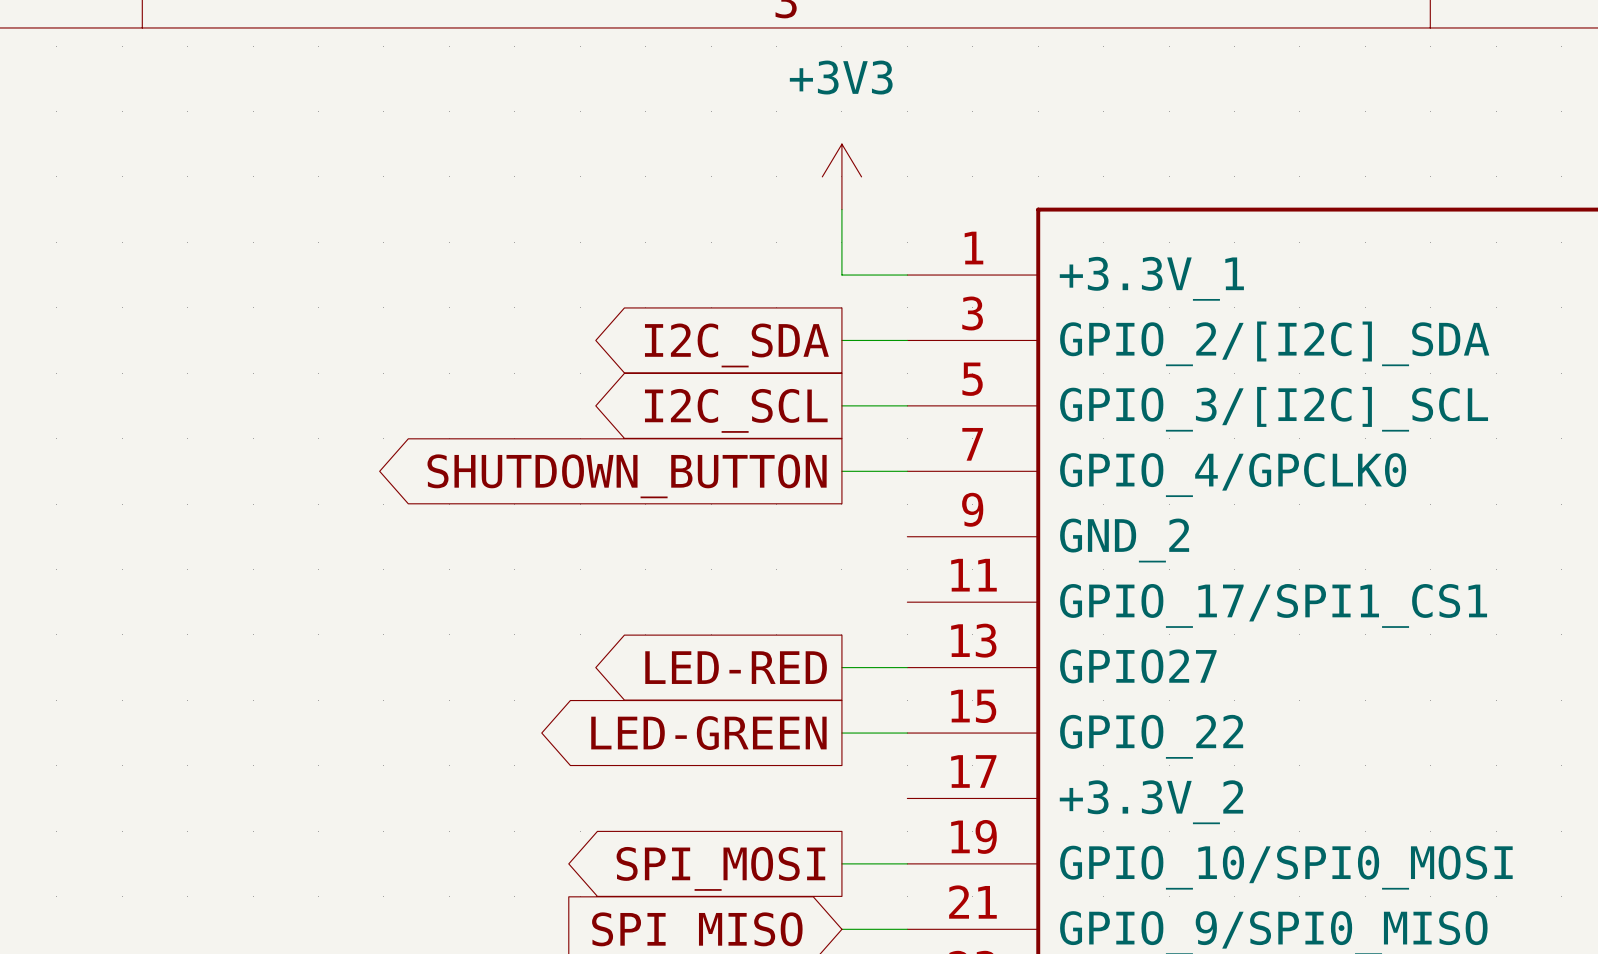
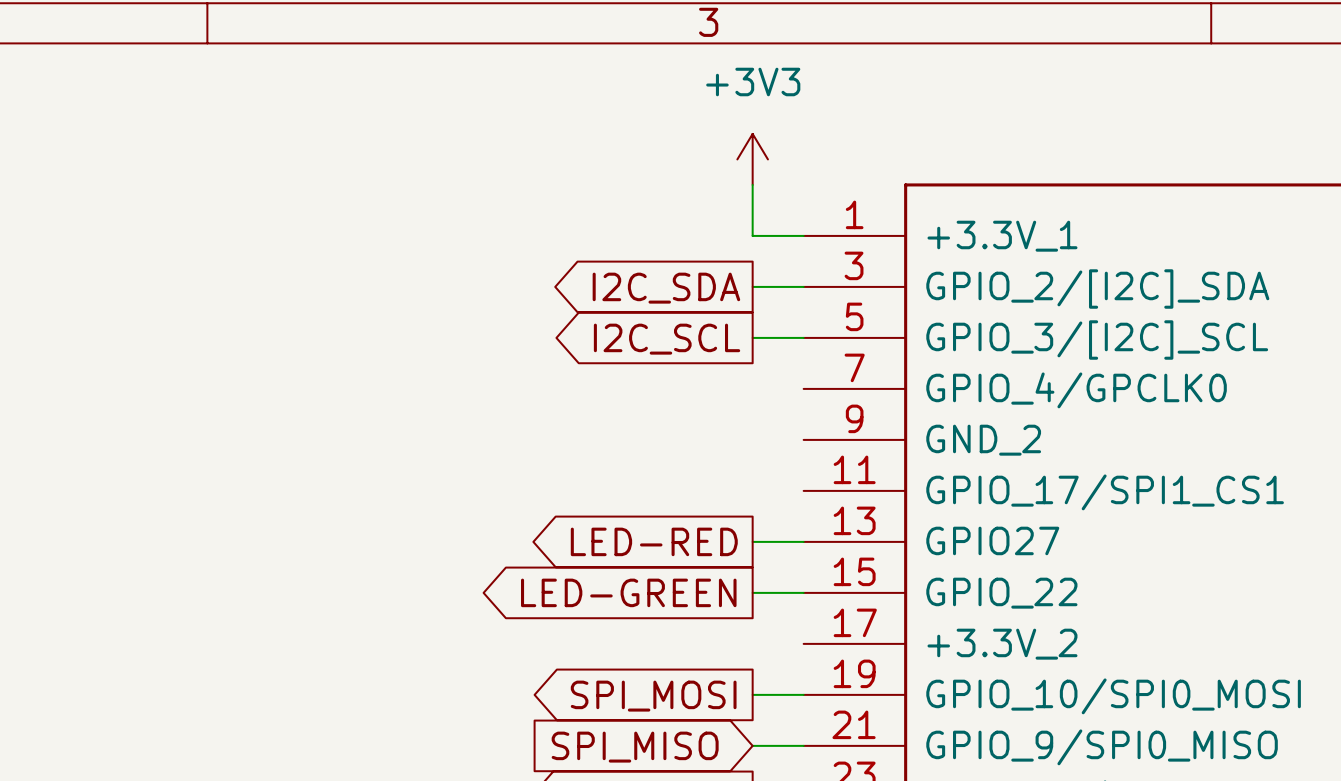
wire: (841, 471) (907, 471) -> none
global label: SHUTDOWN_BUTTON (627, 476) -> none

